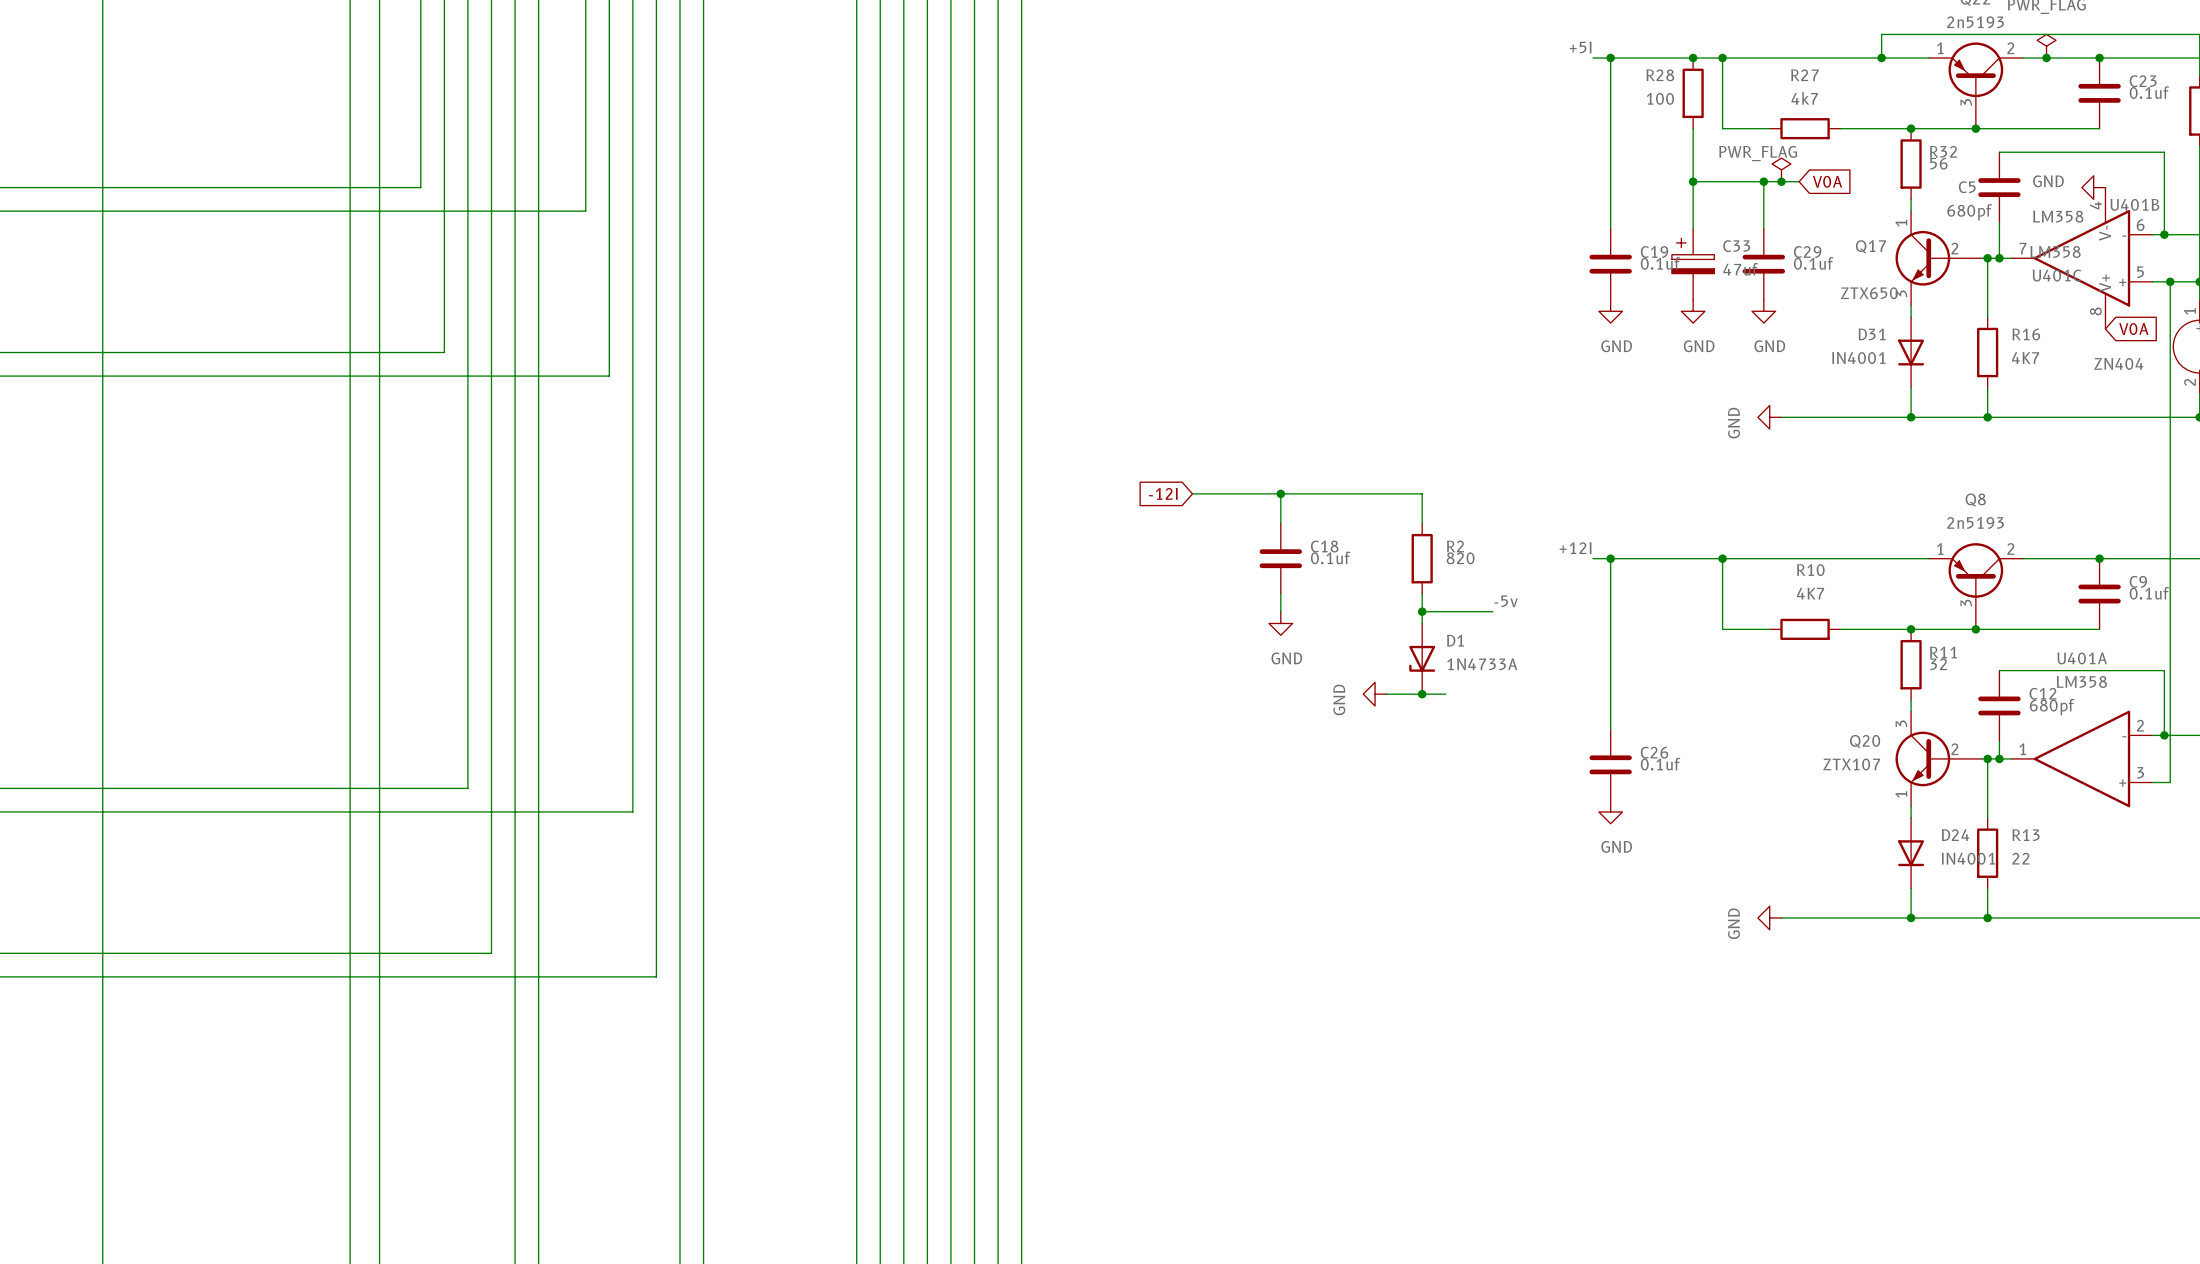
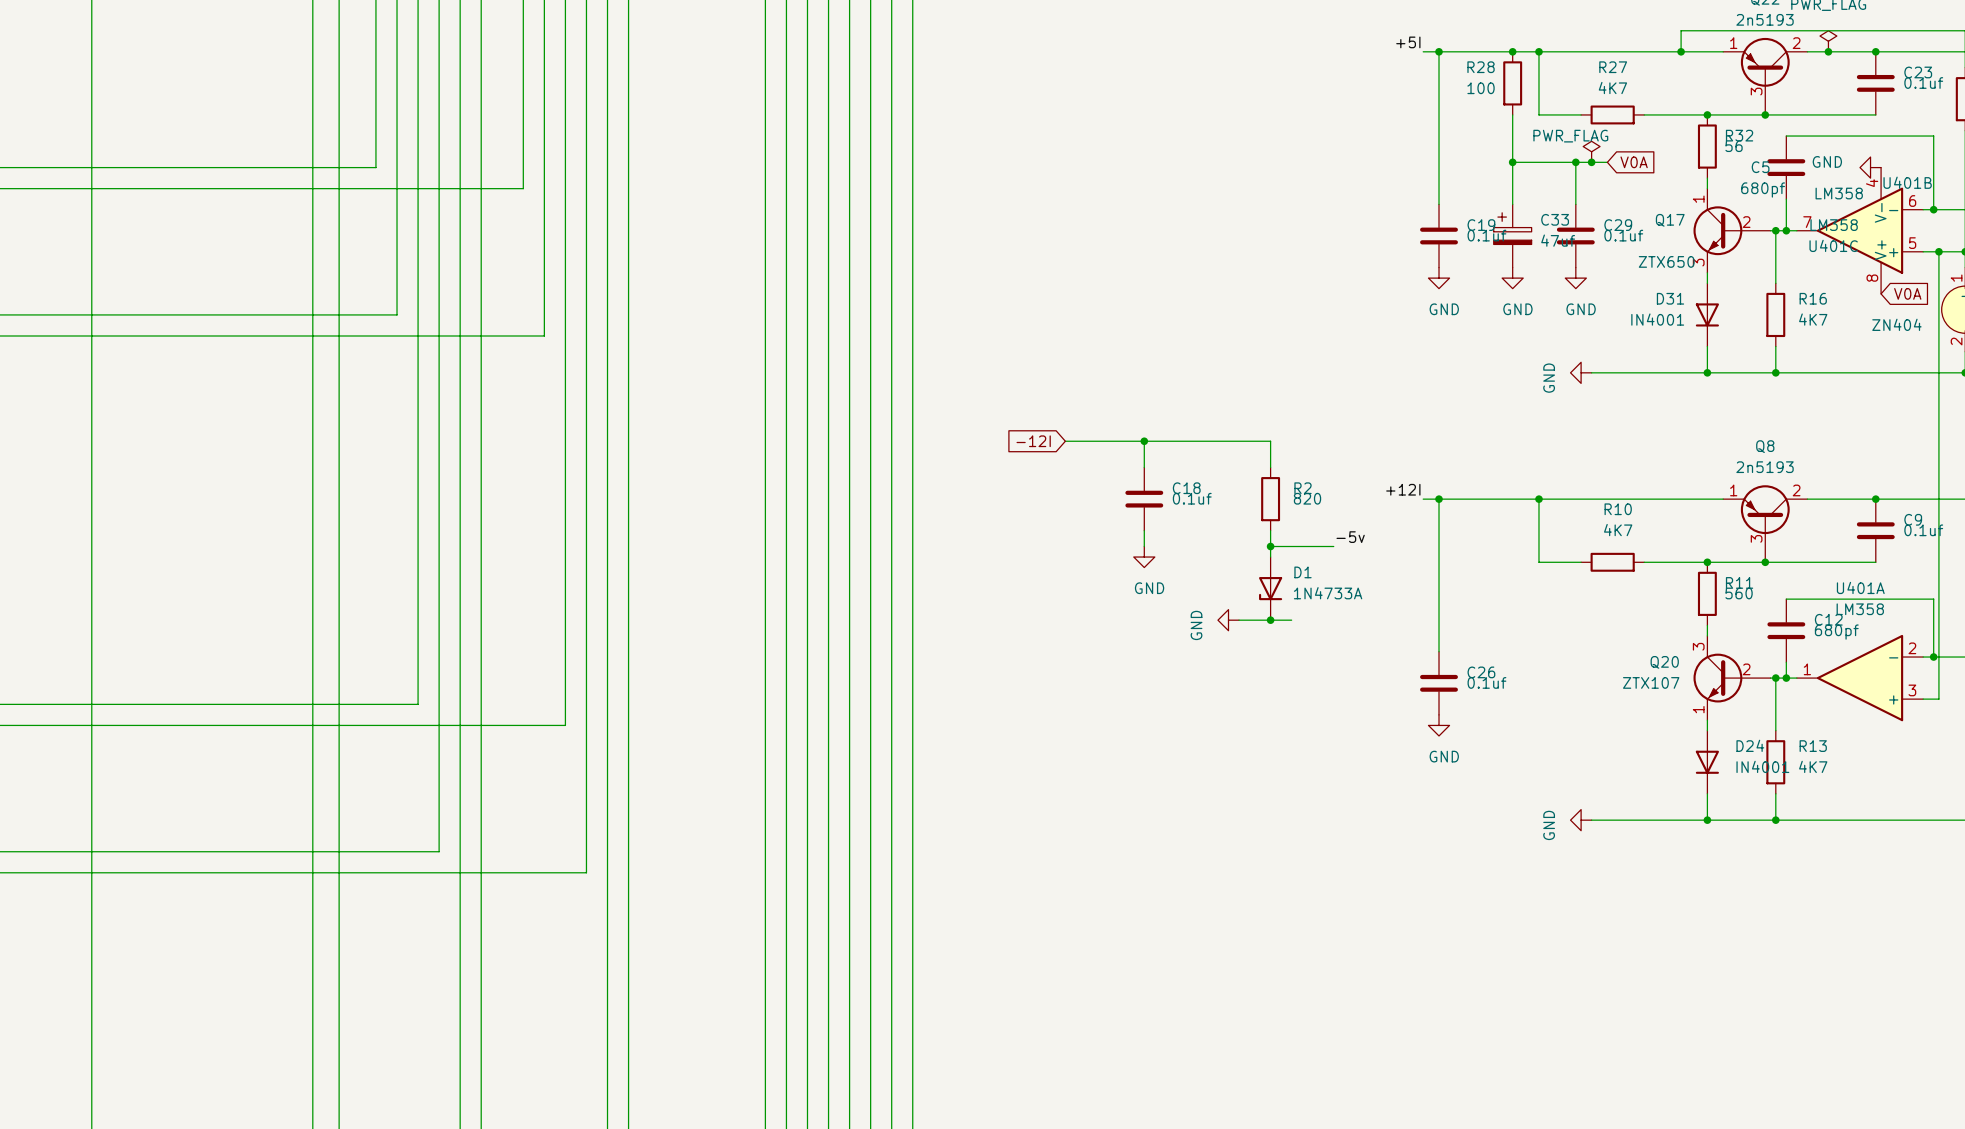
R27 value: 4k7 (1804, 98) -> 4K7 (1612, 88)
R11 value: 32 (1938, 664) -> 560 (1739, 593)
R13 value: 22 (2020, 858) -> 4K7 (1813, 766)

